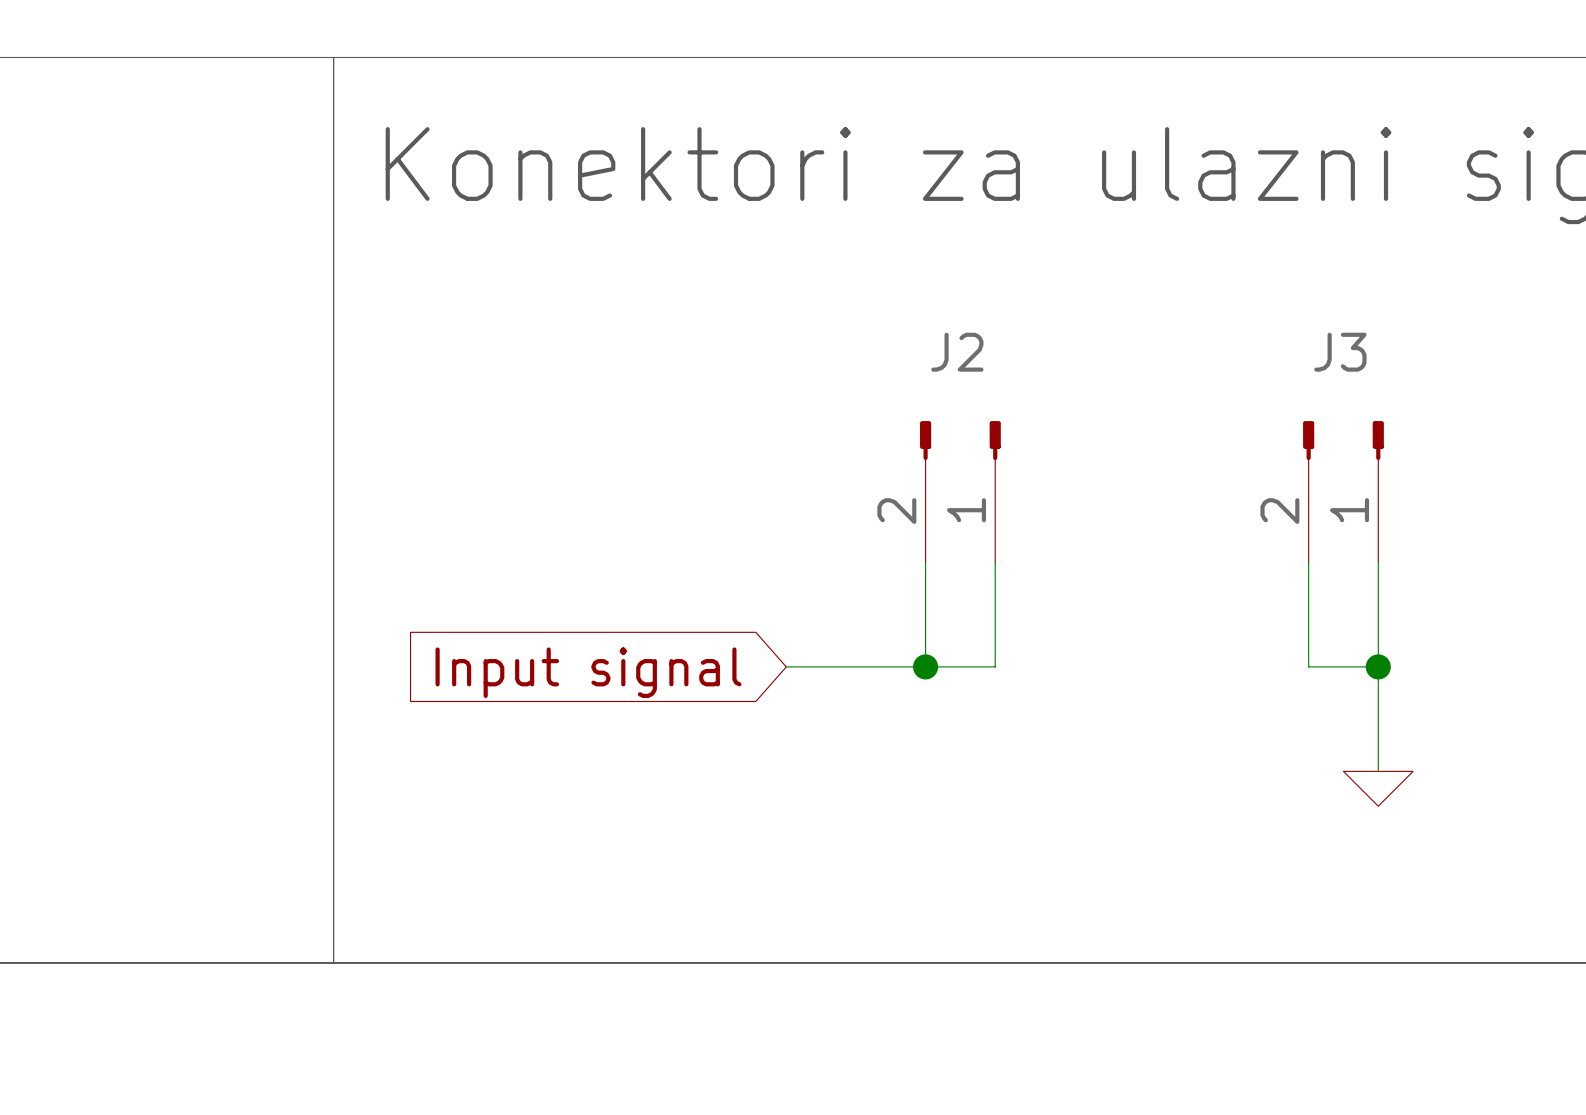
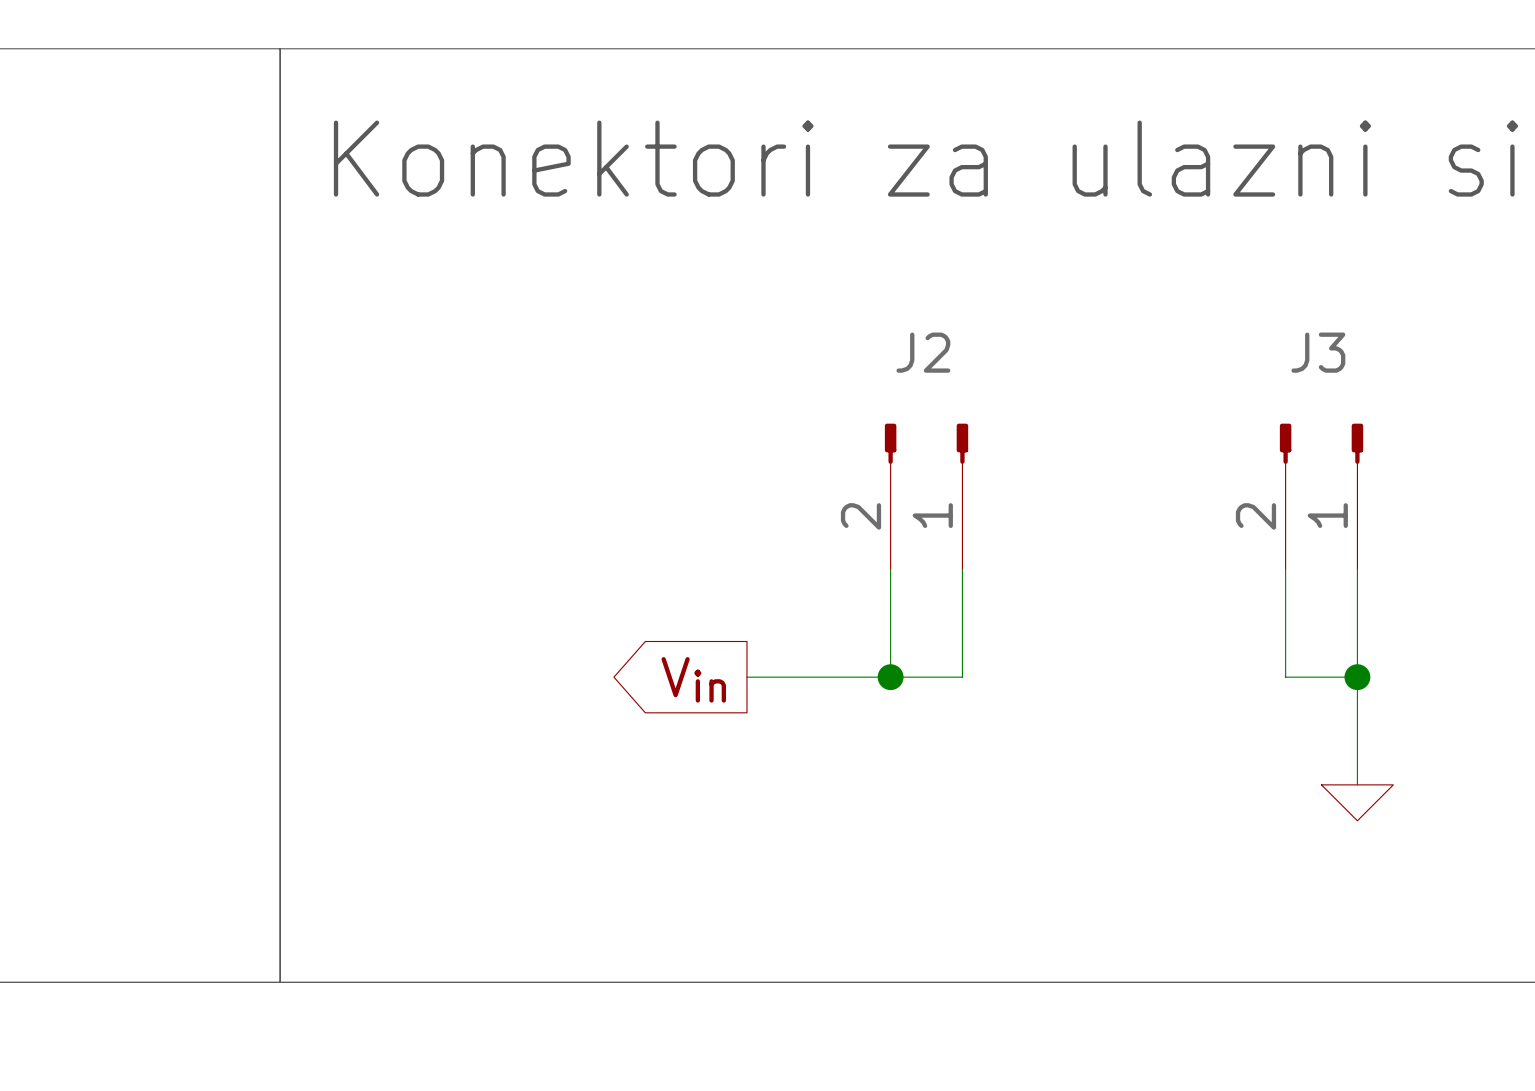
global label shape: input (588, 672) -> output (693, 679)
global label: Input signal (588, 672) -> Vin (693, 679)

